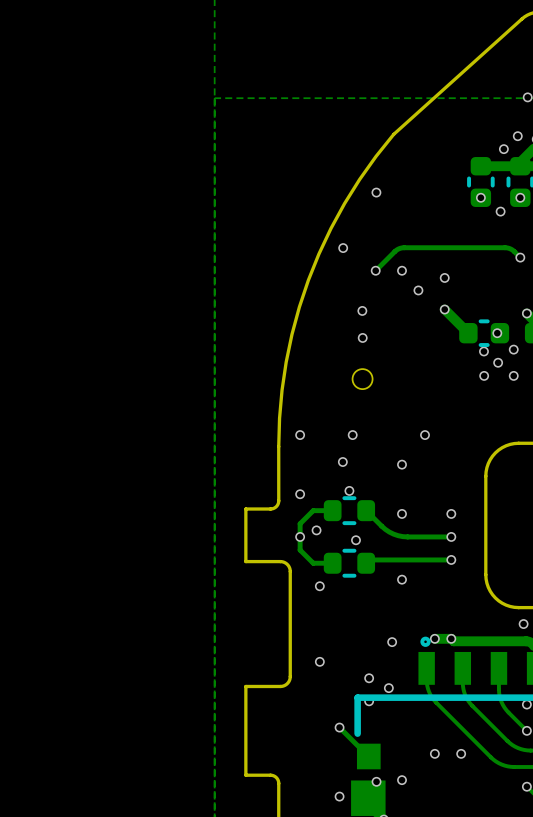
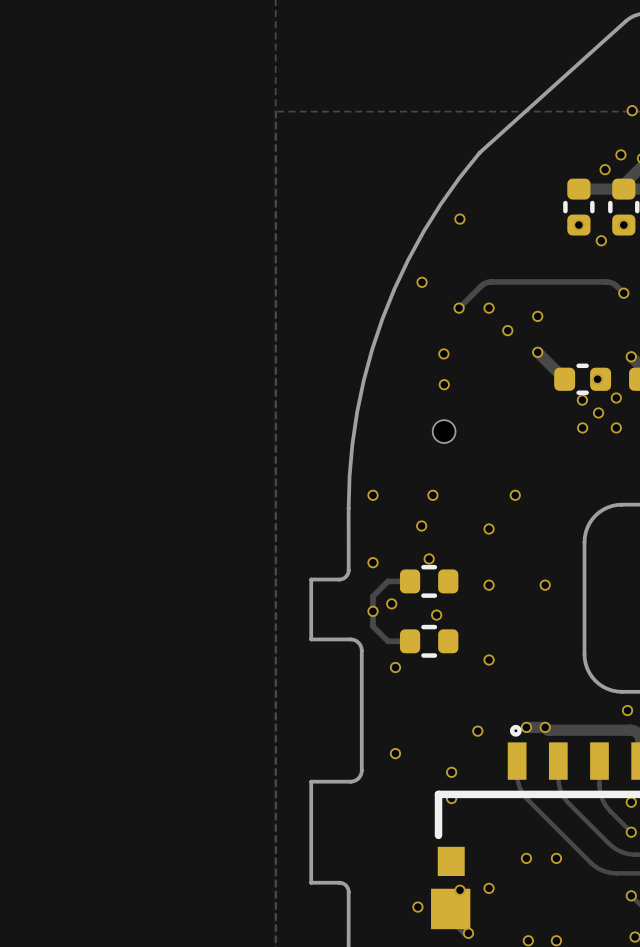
track: (366, 510) (385, 529) (398, 535) (451, 536) -> none
via: (451, 536) -> none
track: (451, 559) (369, 559) (366, 563) -> none
via: (451, 559) -> none
via: (388, 688) -> none
track: (339, 727) (368, 756) -> none
via: (339, 727) -> none

